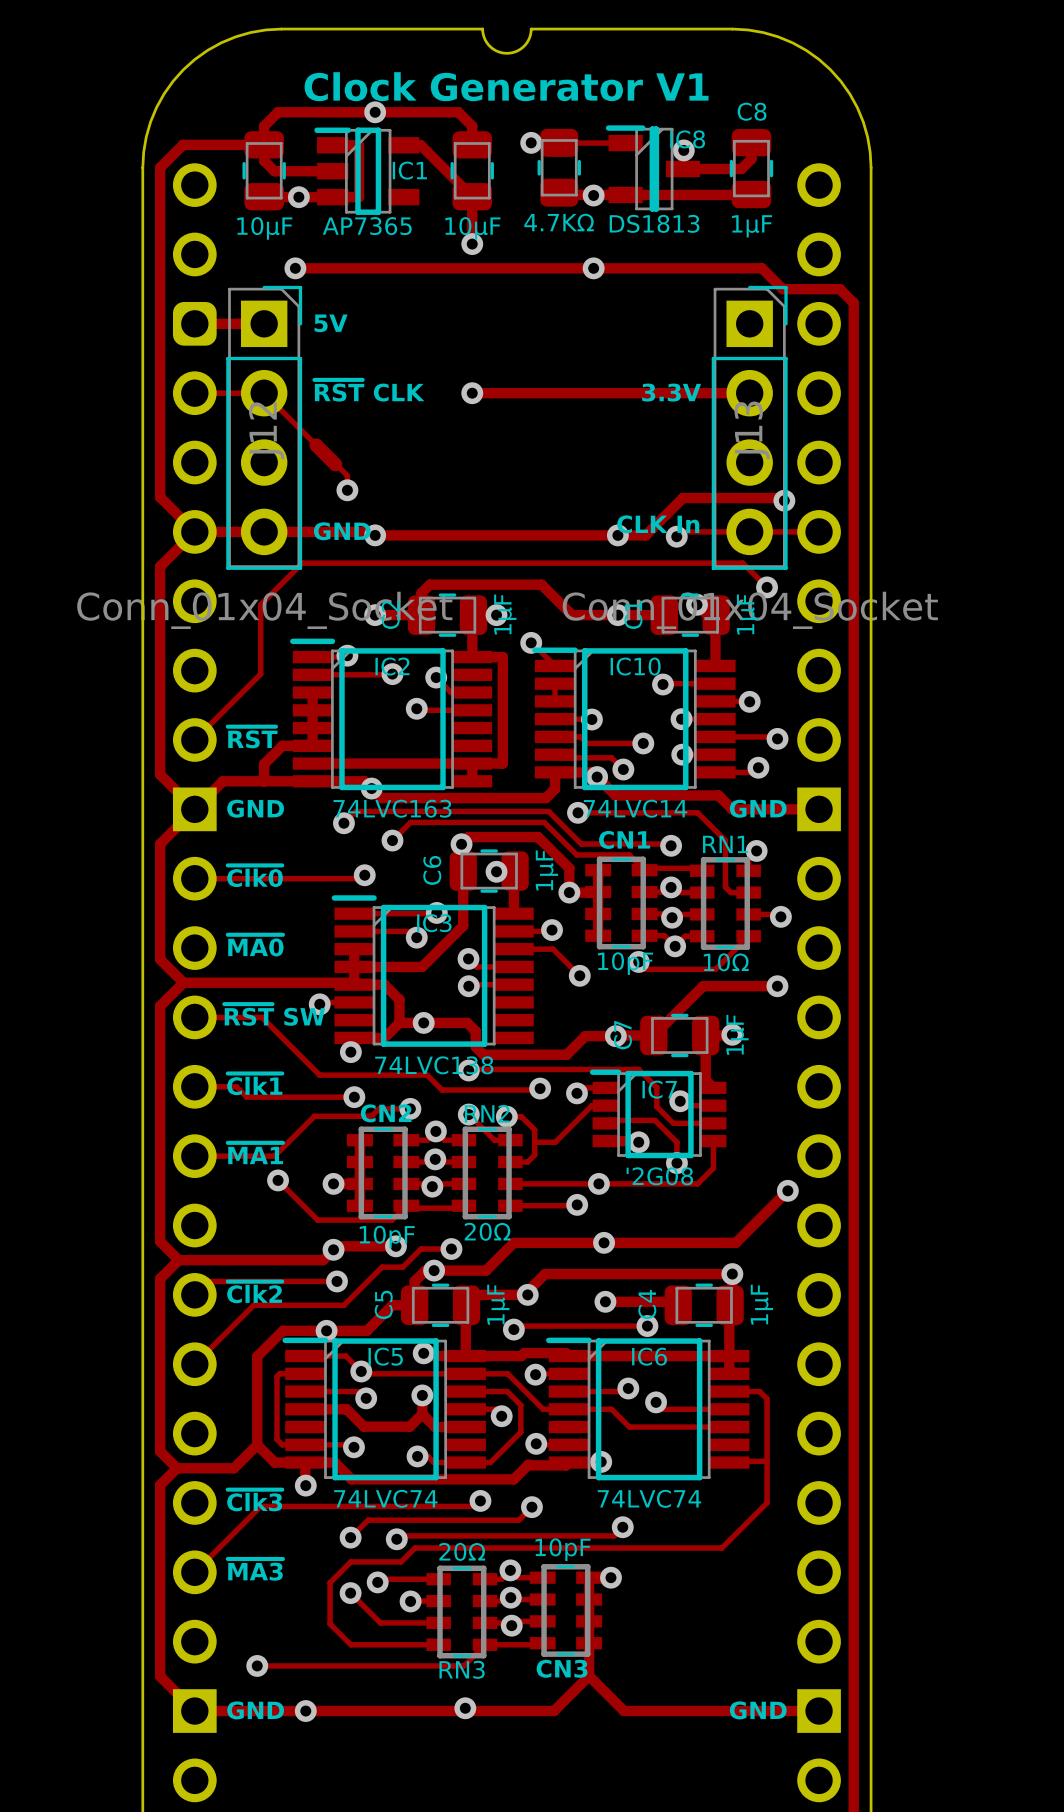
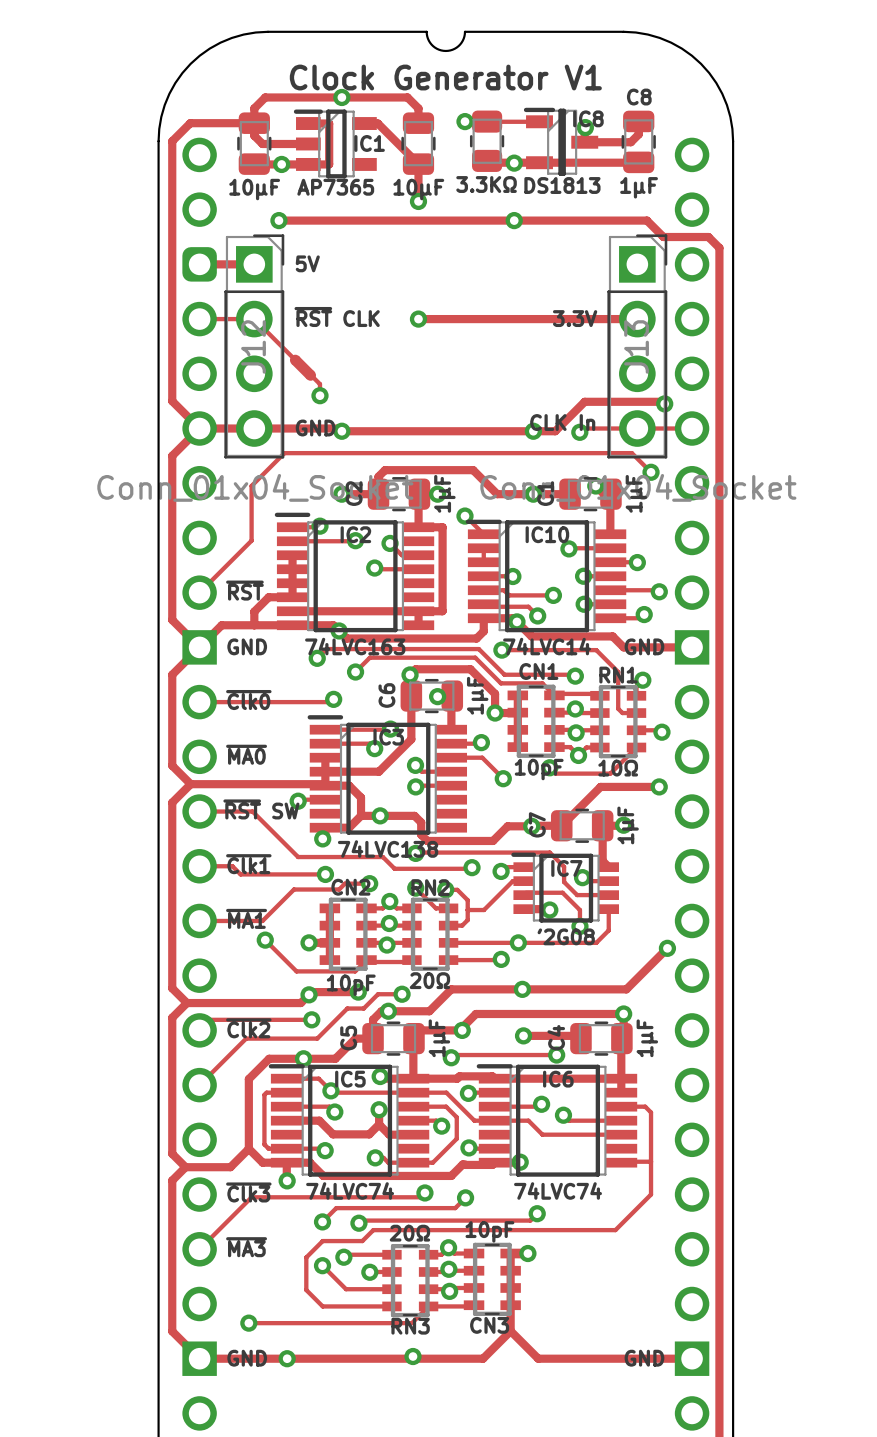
part value: 4.7KΩ (559, 222) -> 3.3KΩ (486, 184)

